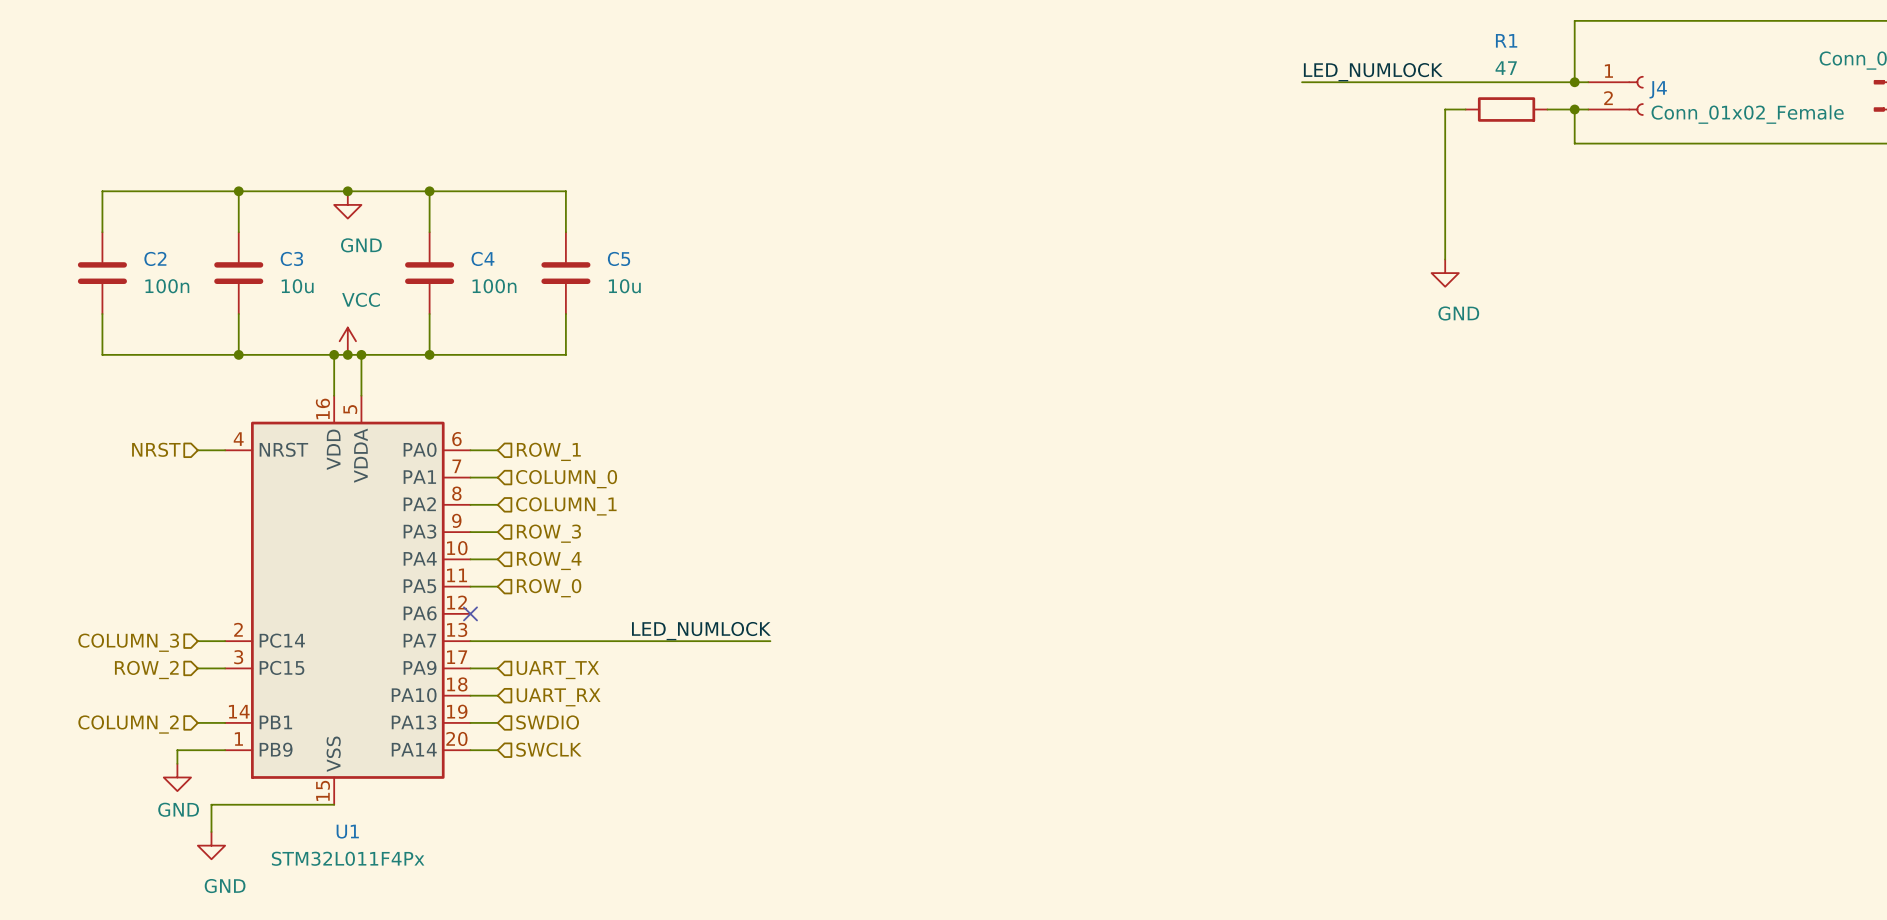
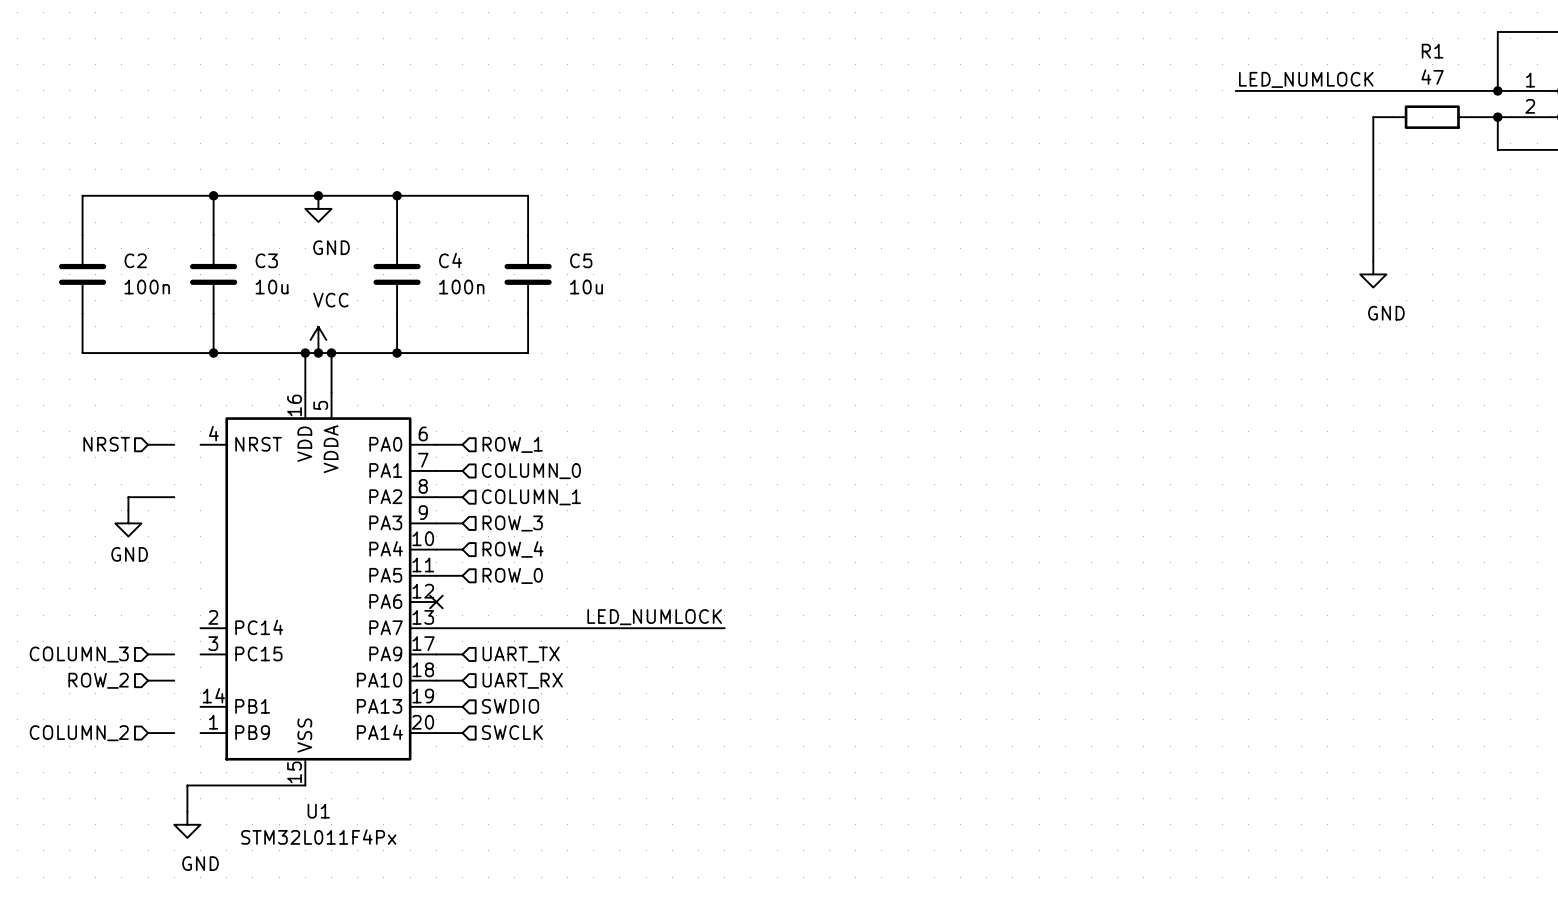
hierarchical label position: NRST (156, 449) -> NRST (106, 444)
wire: (197, 450) (225, 450) -> (174, 444) (148, 444)
wire: none -> (174, 497) (128, 497) (128, 510)
wire: (197, 641) (225, 641) -> none
hierarchical label position: COLUMN_3 (128, 642) -> COLUMN_3 (79, 654)
wire: (197, 668) (225, 668) -> (174, 654) (148, 654)
hierarchical label position: ROW_2 (146, 669) -> ROW_2 (98, 680)
wire: (197, 722) (225, 722) -> none
hierarchical label position: COLUMN_2 (128, 724) -> COLUMN_2 (79, 733)
wire: (177, 750) (177, 763) -> (154, 733) (148, 733)
wire: (197, 750) (225, 750) -> (148, 680) (174, 680)
power symbol position: GND (177, 777) -> GND (128, 523)

